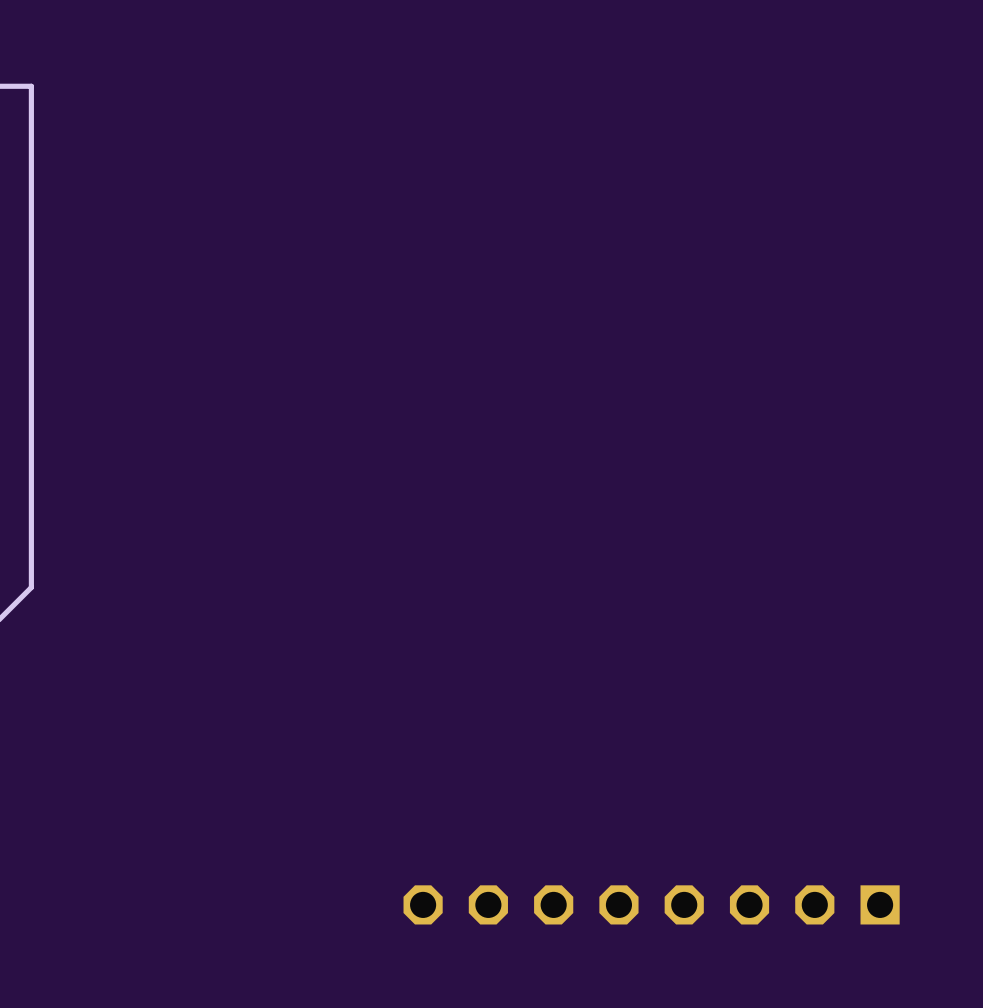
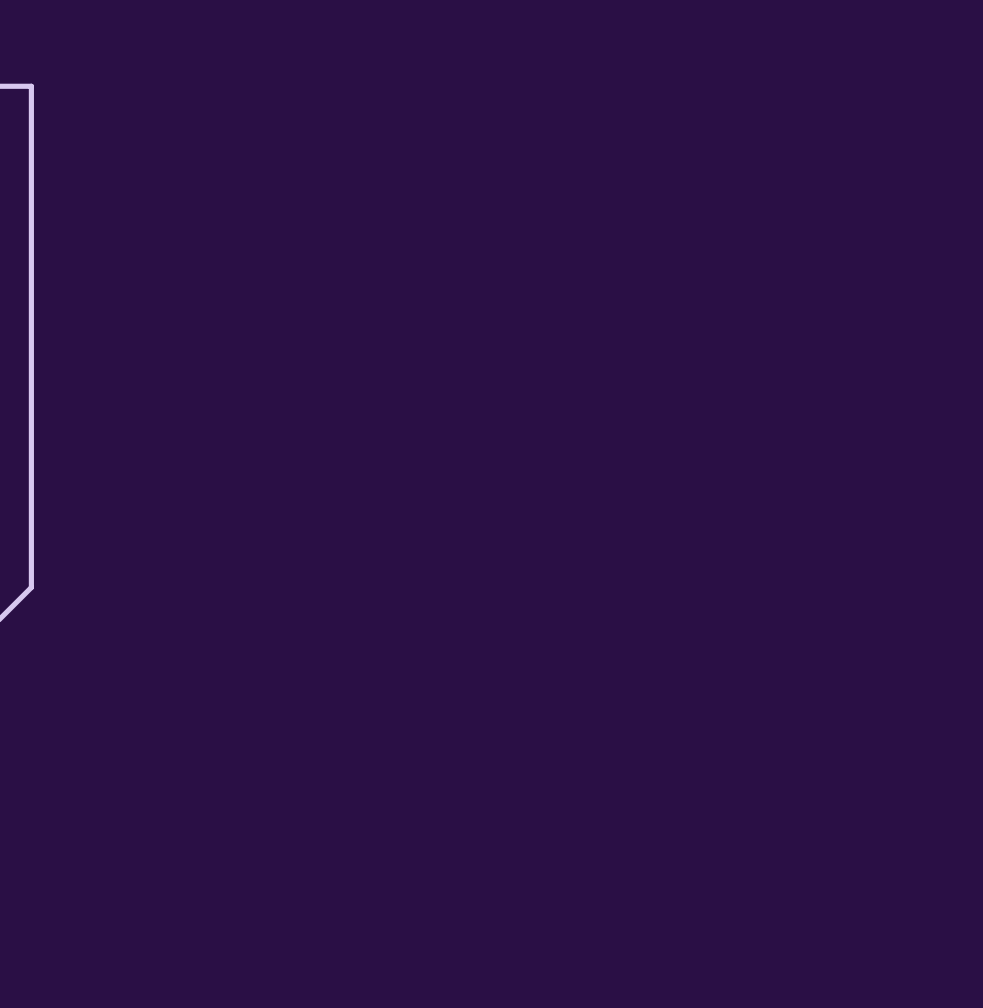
part: (651, 904) -> none

